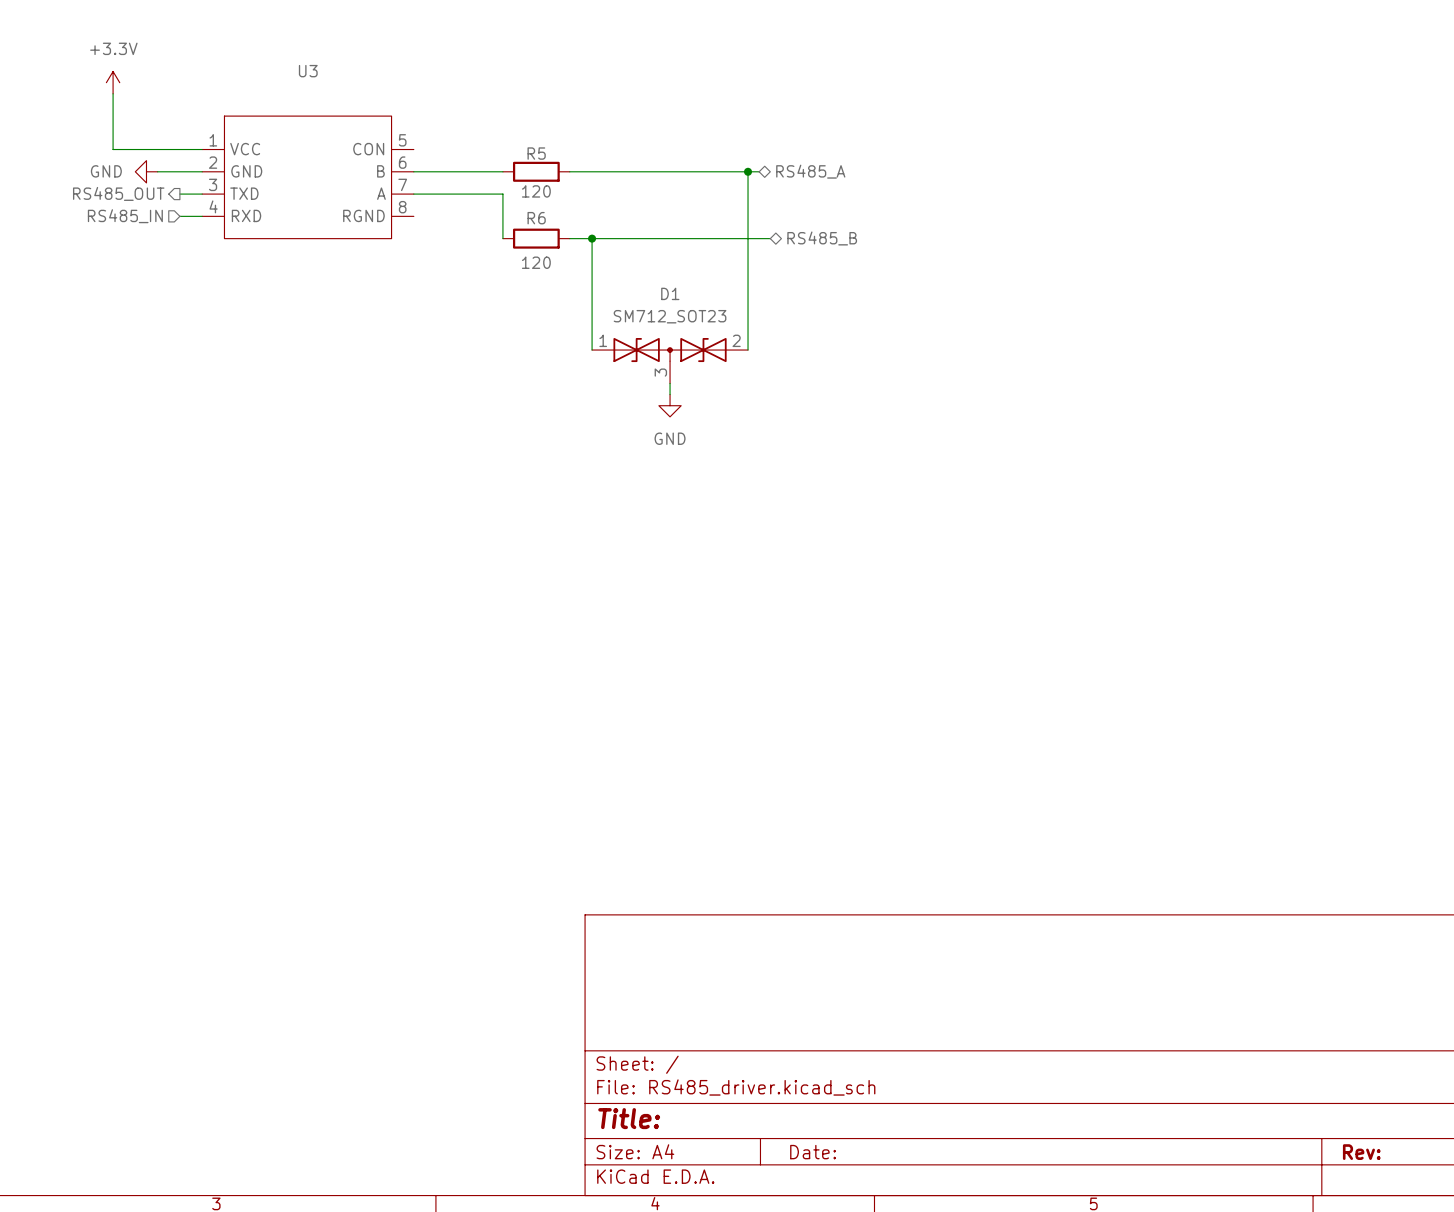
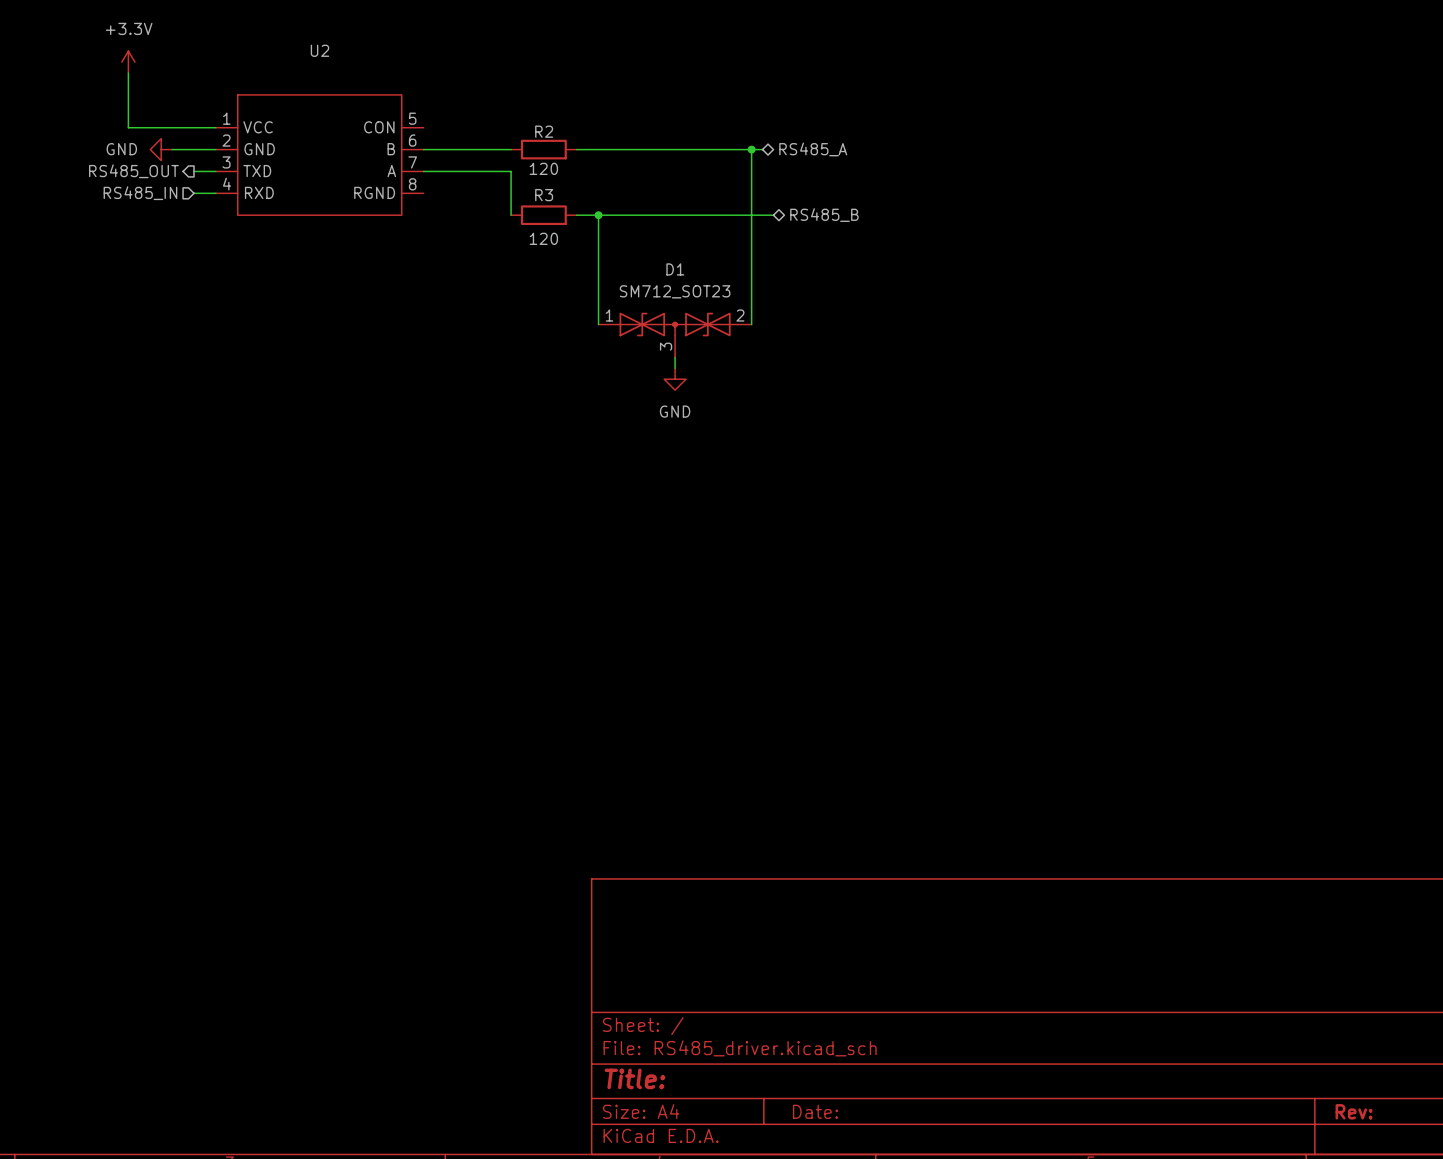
U3 name: U3 (308, 71) -> U2 (319, 50)
R5 name: R5 (536, 153) -> R2 (544, 131)
R6 name: R6 (536, 218) -> R3 (544, 195)

